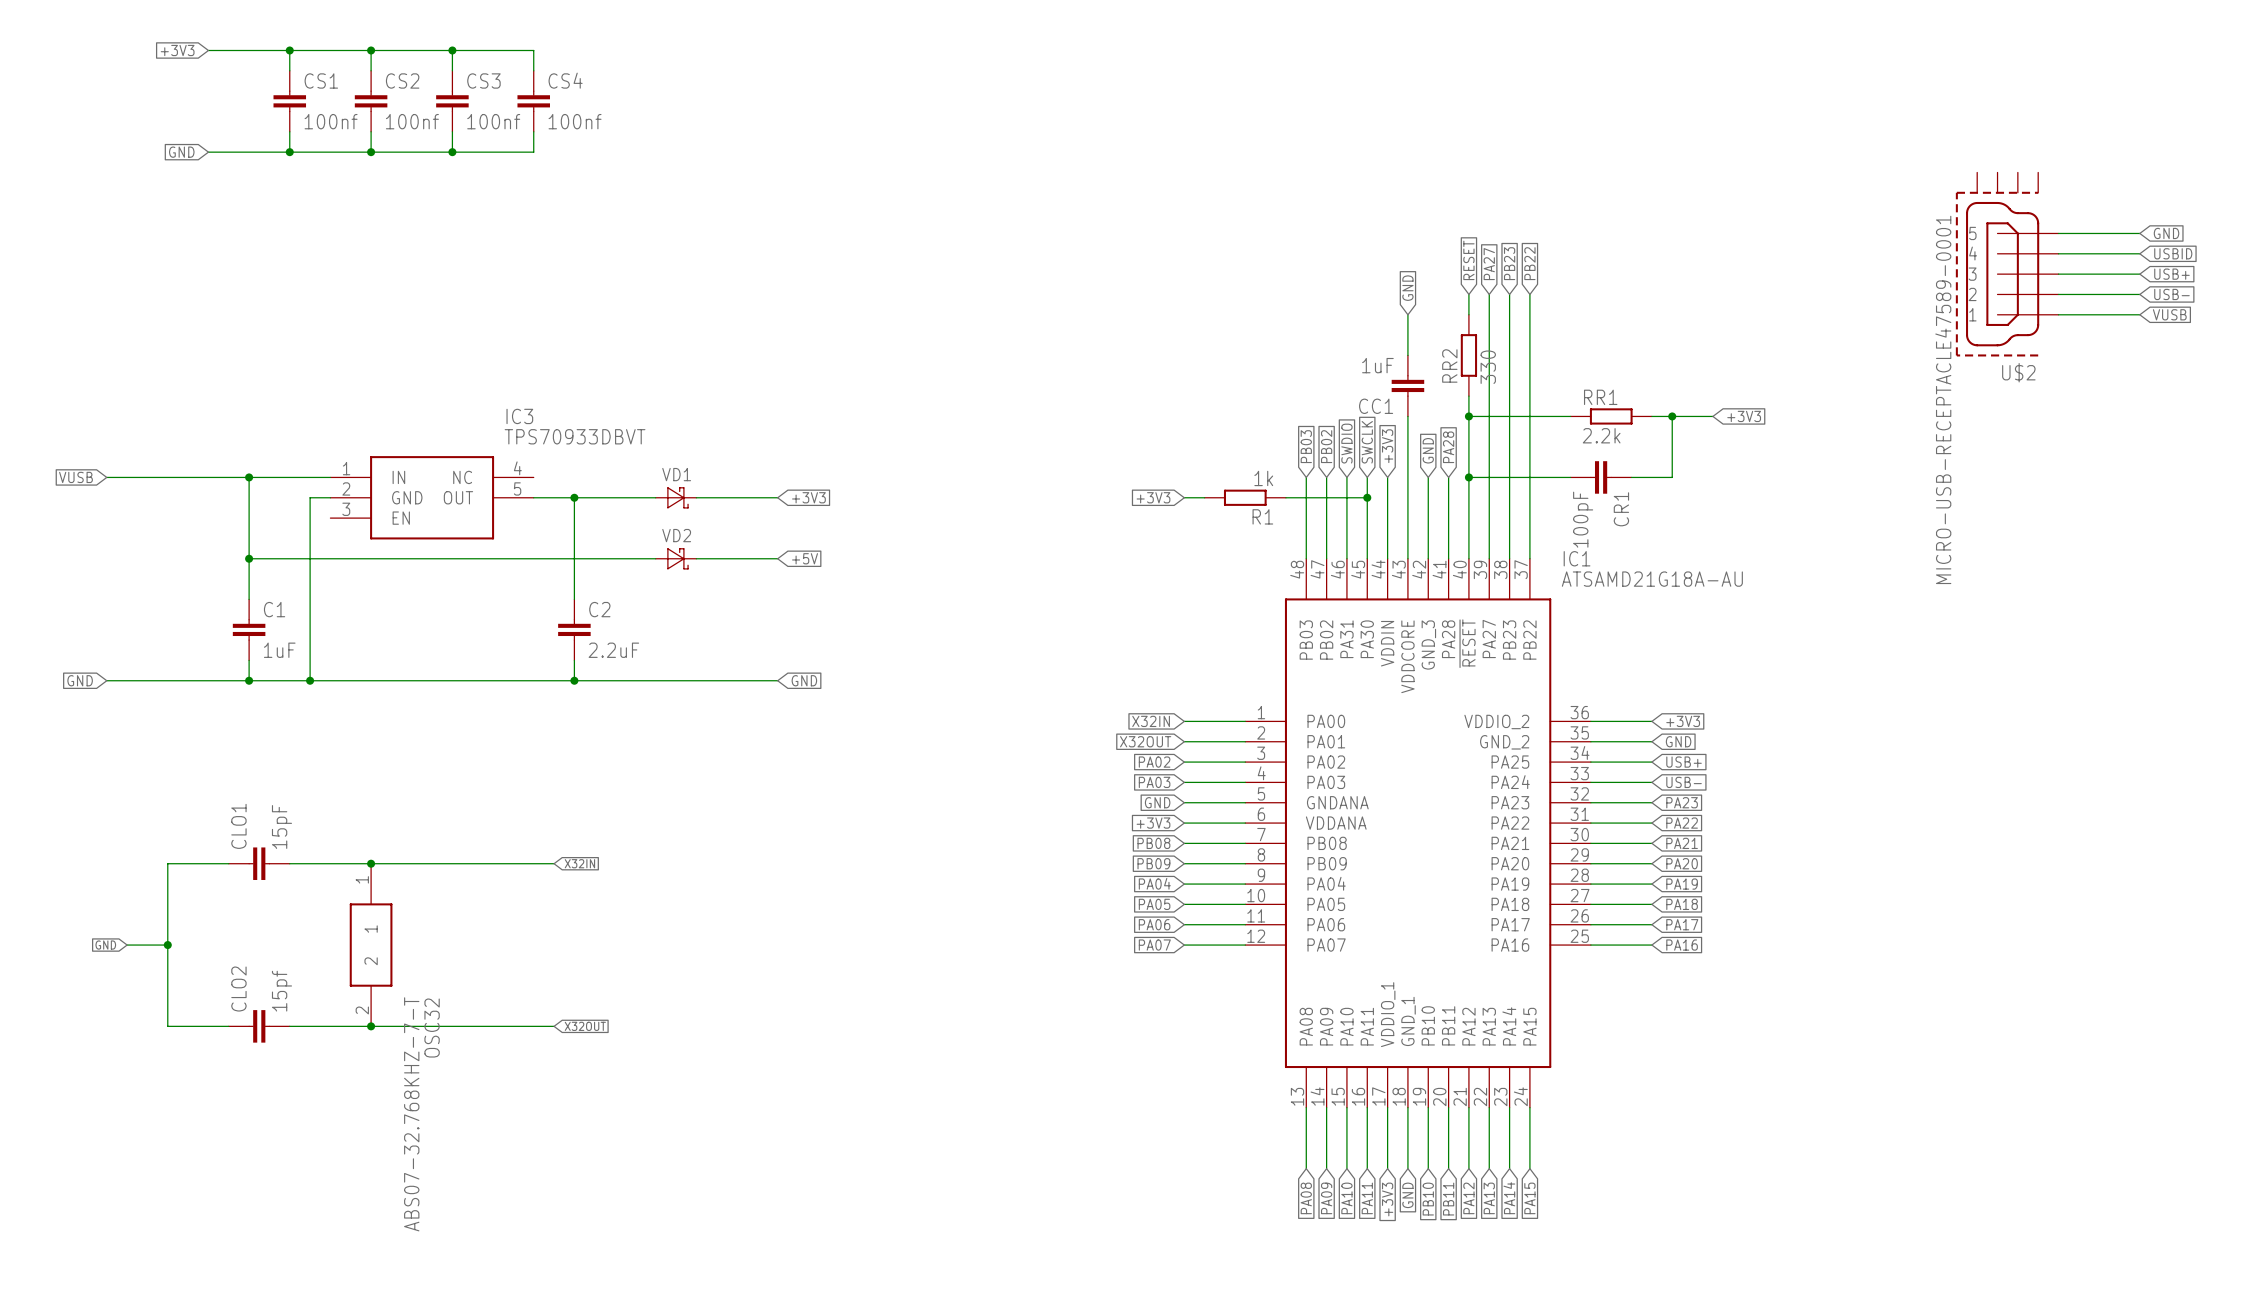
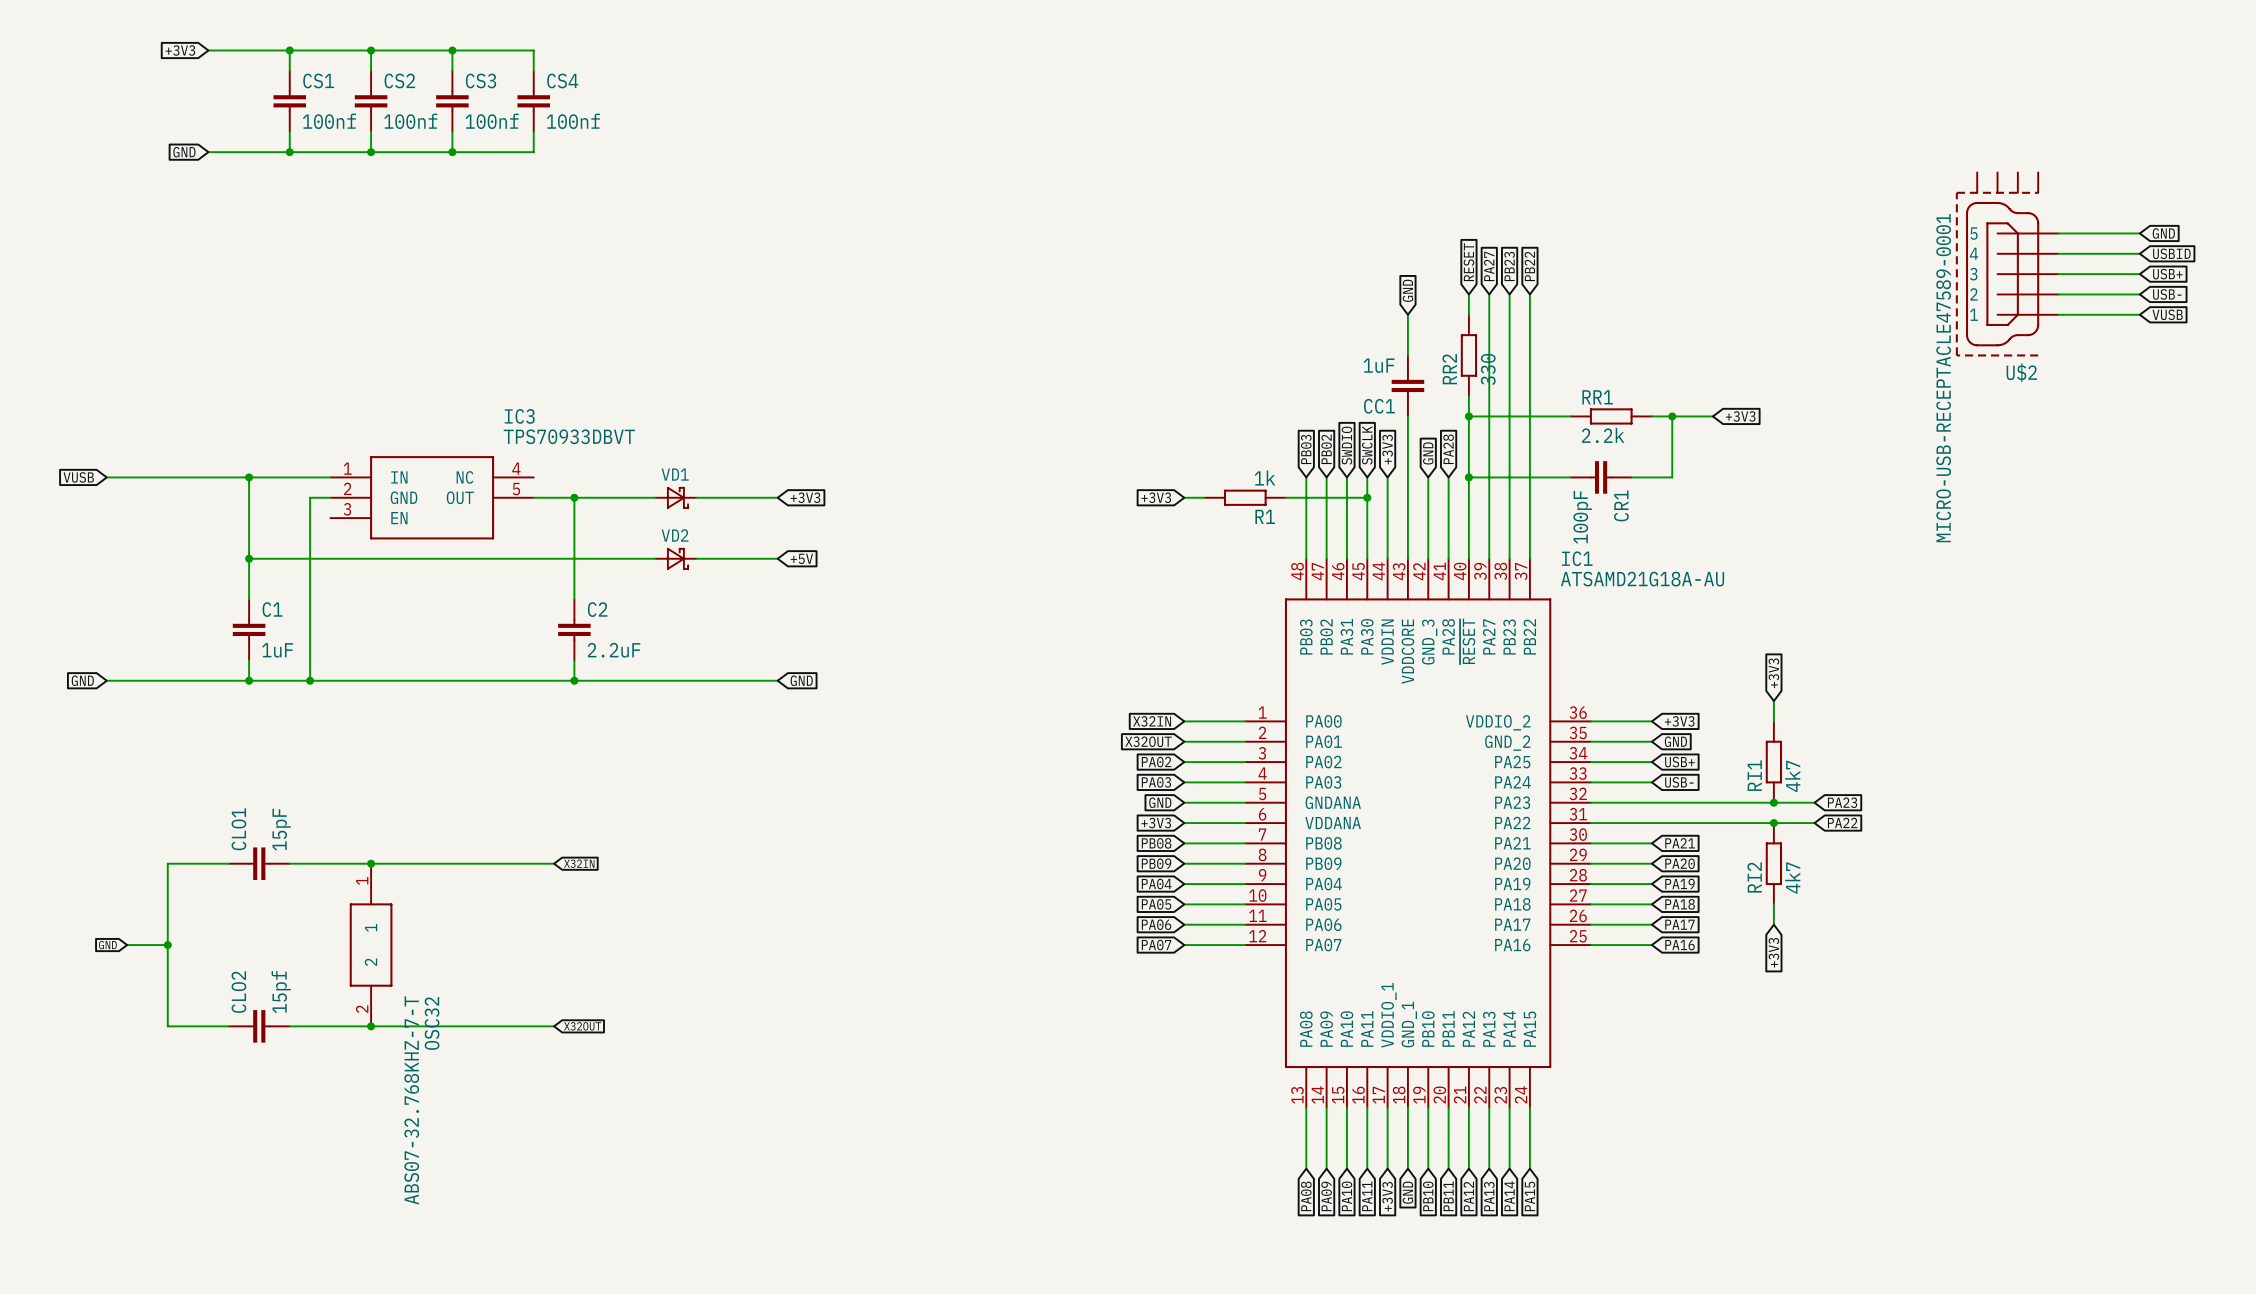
global label: none -> +3V3 (1773, 673)
wire: none -> (1773, 701) (1773, 721)
RI1: none -> 4k7 (1773, 762)
wire: none -> (1651, 802) (1814, 802)
global label position: PA23 (1682, 802) -> PA23 (1842, 802)
junction: none -> (1773, 802)
wire: none -> (1651, 823) (1814, 823)
global label position: PA22 (1682, 823) -> PA22 (1842, 822)
junction: none -> (1773, 823)
RI2: none -> 4k7 (1773, 863)
wire: none -> (1773, 904) (1773, 924)
global label: none -> +3V3 (1773, 952)

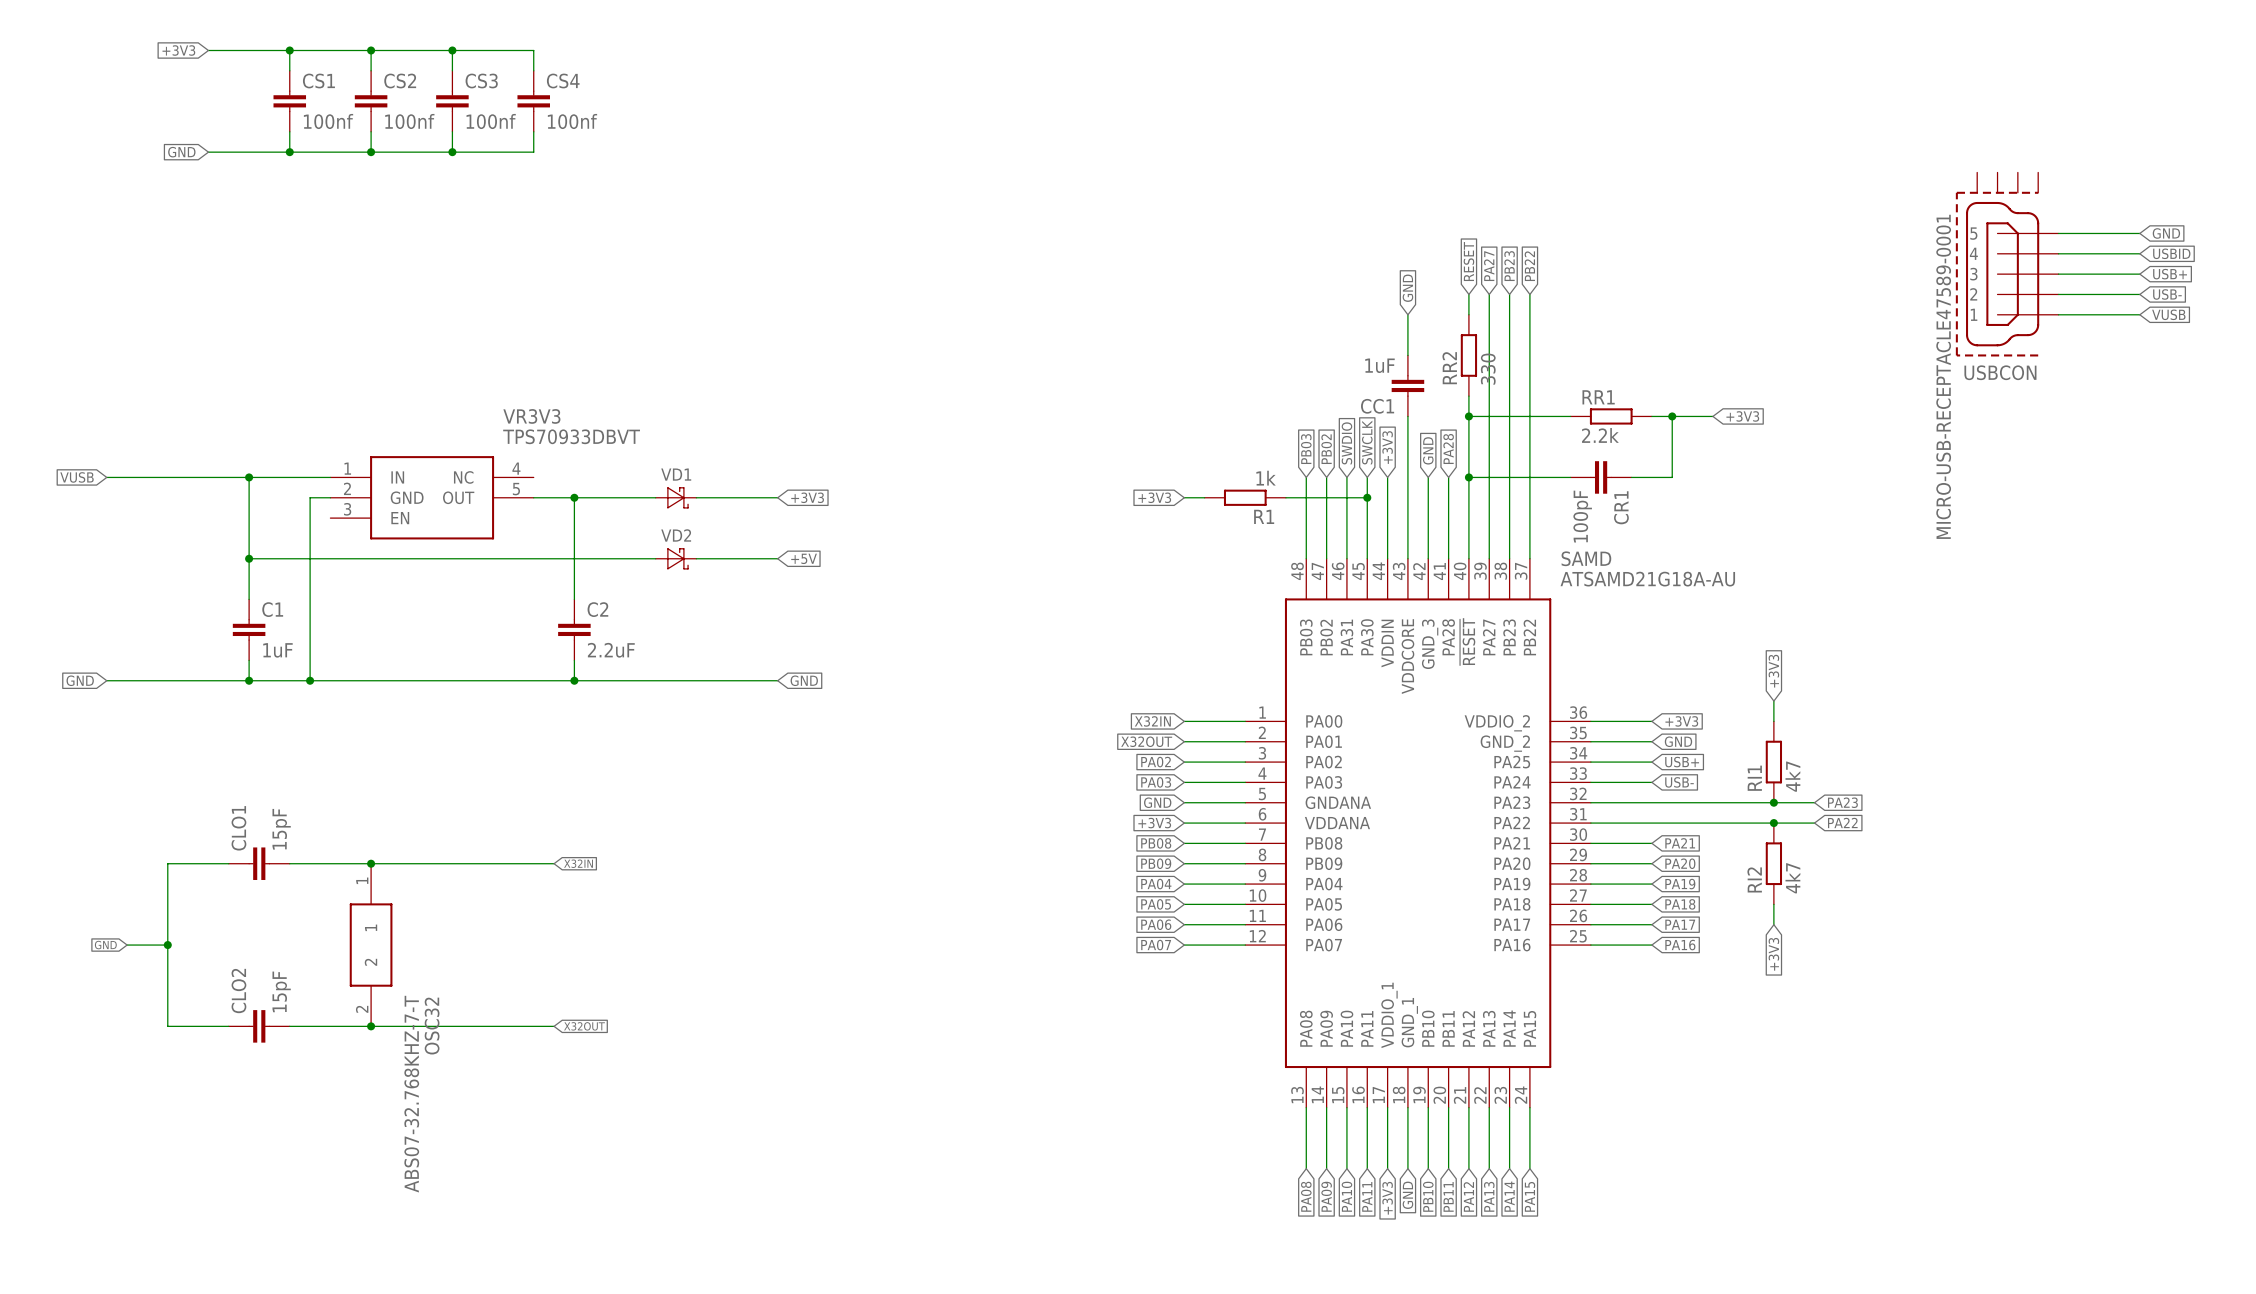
U$2 name: U$2 (2021, 372) -> USBCON (2000, 372)
IC3 name: IC3 (519, 416) -> VR3V3 (531, 416)
IC1 name: IC1 (1577, 558) -> SAMD (1586, 558)
CLO2 value: 15pf (281, 992) -> 15pF (281, 991)

